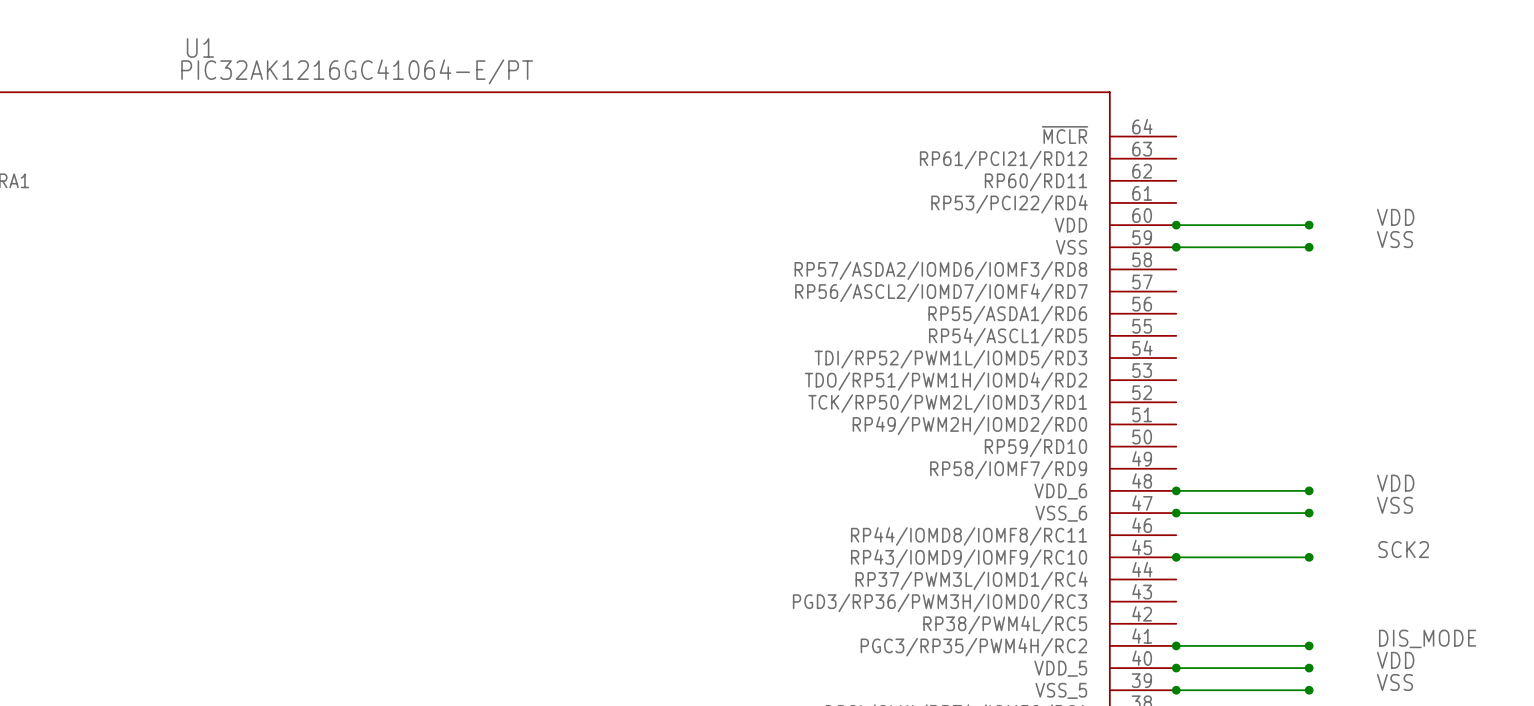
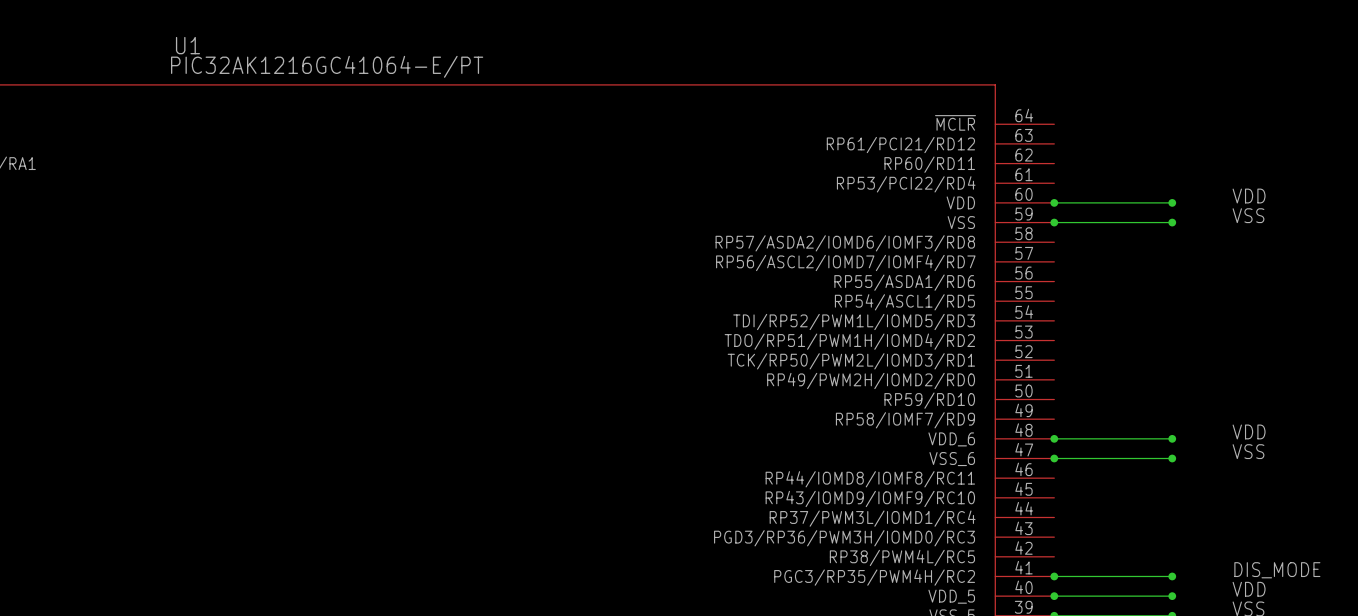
label: SCK2 (1403, 549) -> none
wire: (1176, 557) (1309, 557) -> none
junction: (1176, 557) -> none
junction: (1309, 557) -> none

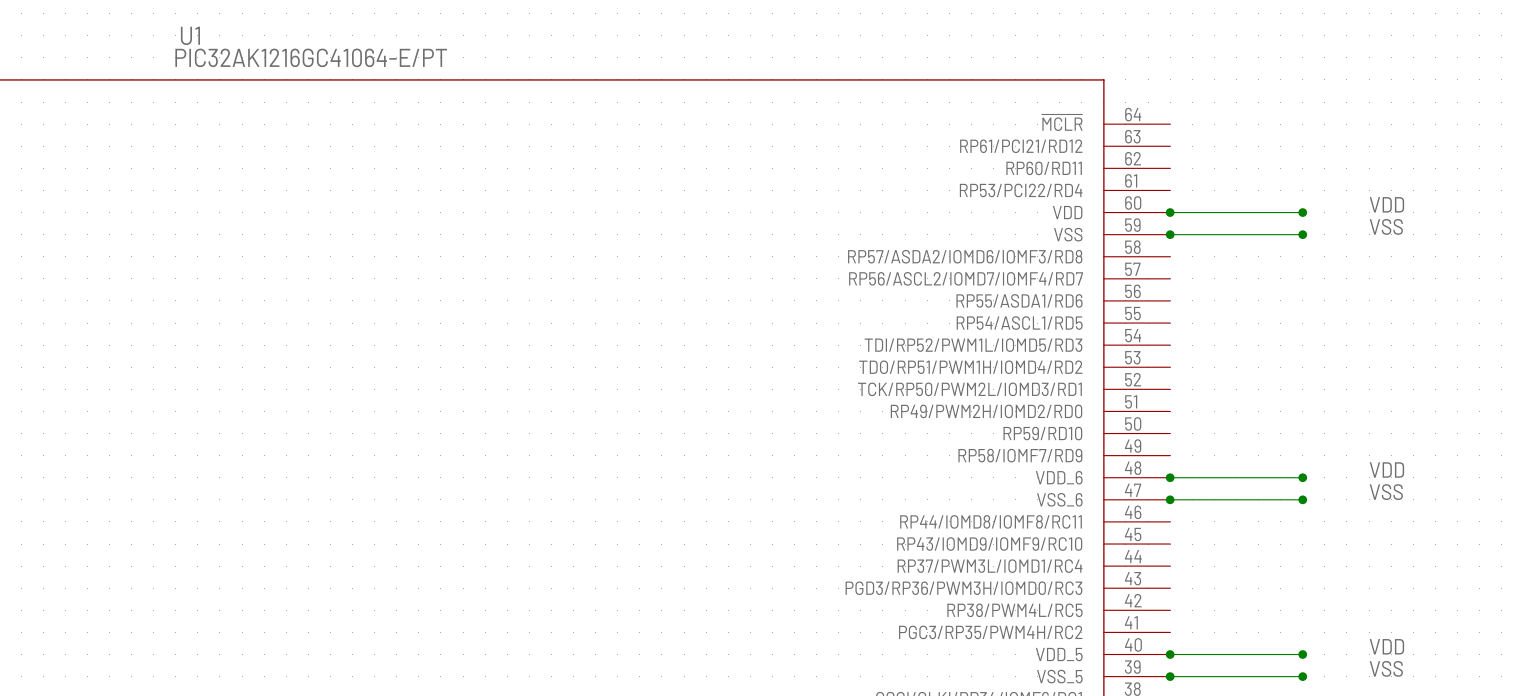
label: DIS_MODE (1277, 570) -> none
wire: (1054, 576) (1172, 576) -> none
junction: (1054, 576) -> none
junction: (1172, 576) -> none

